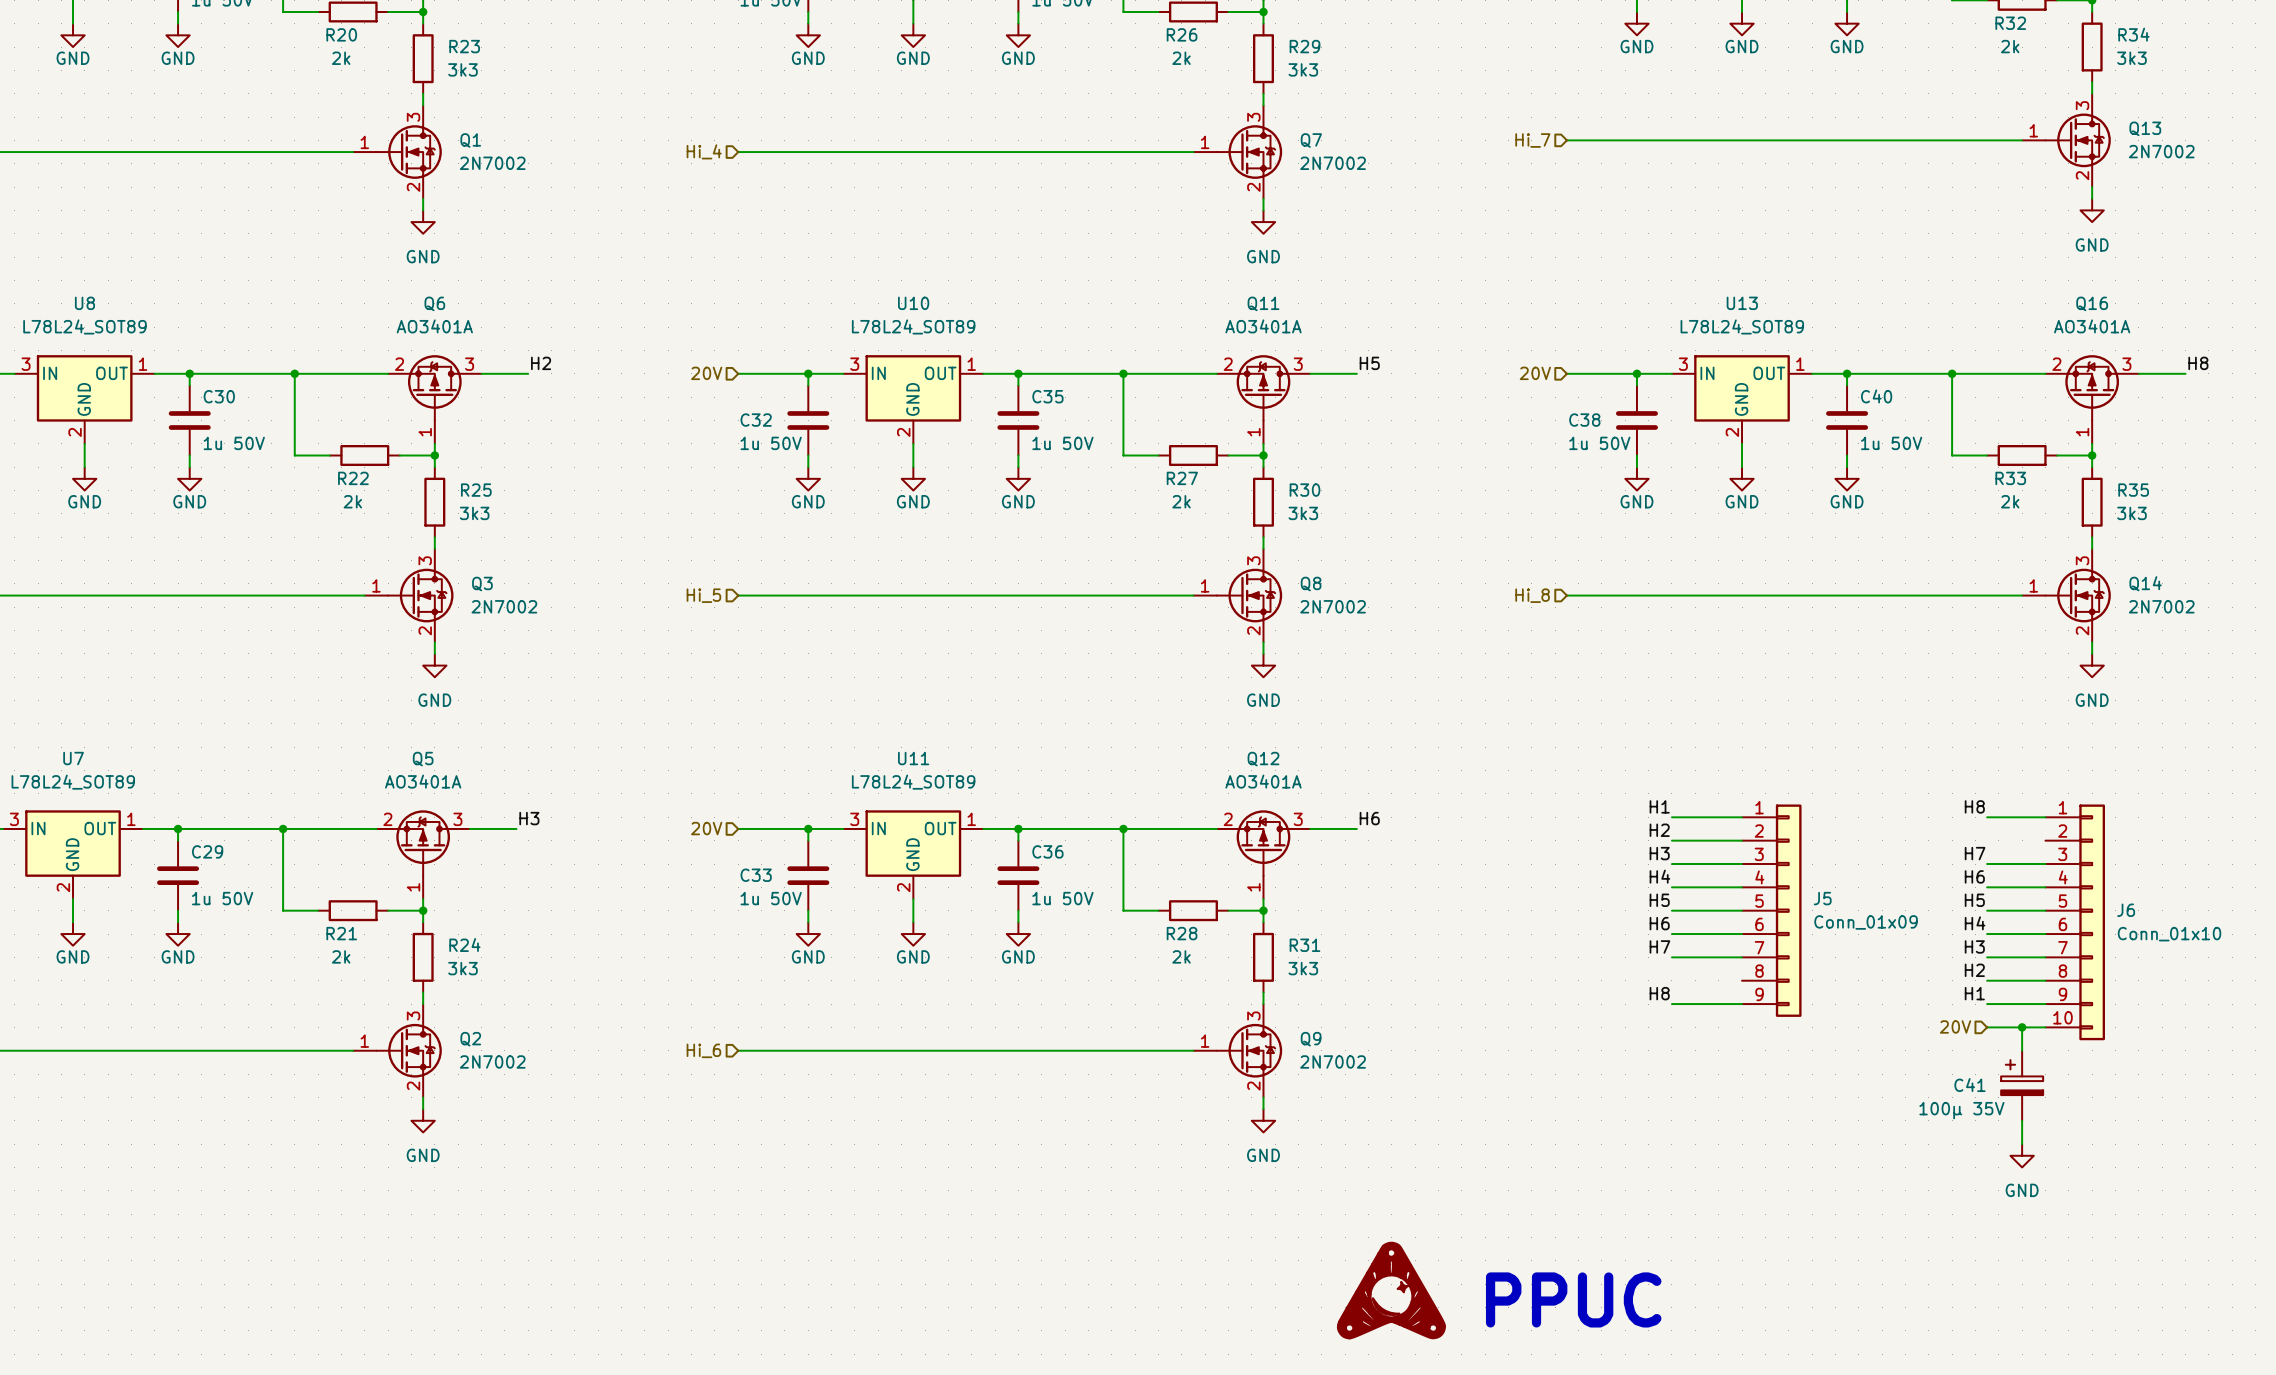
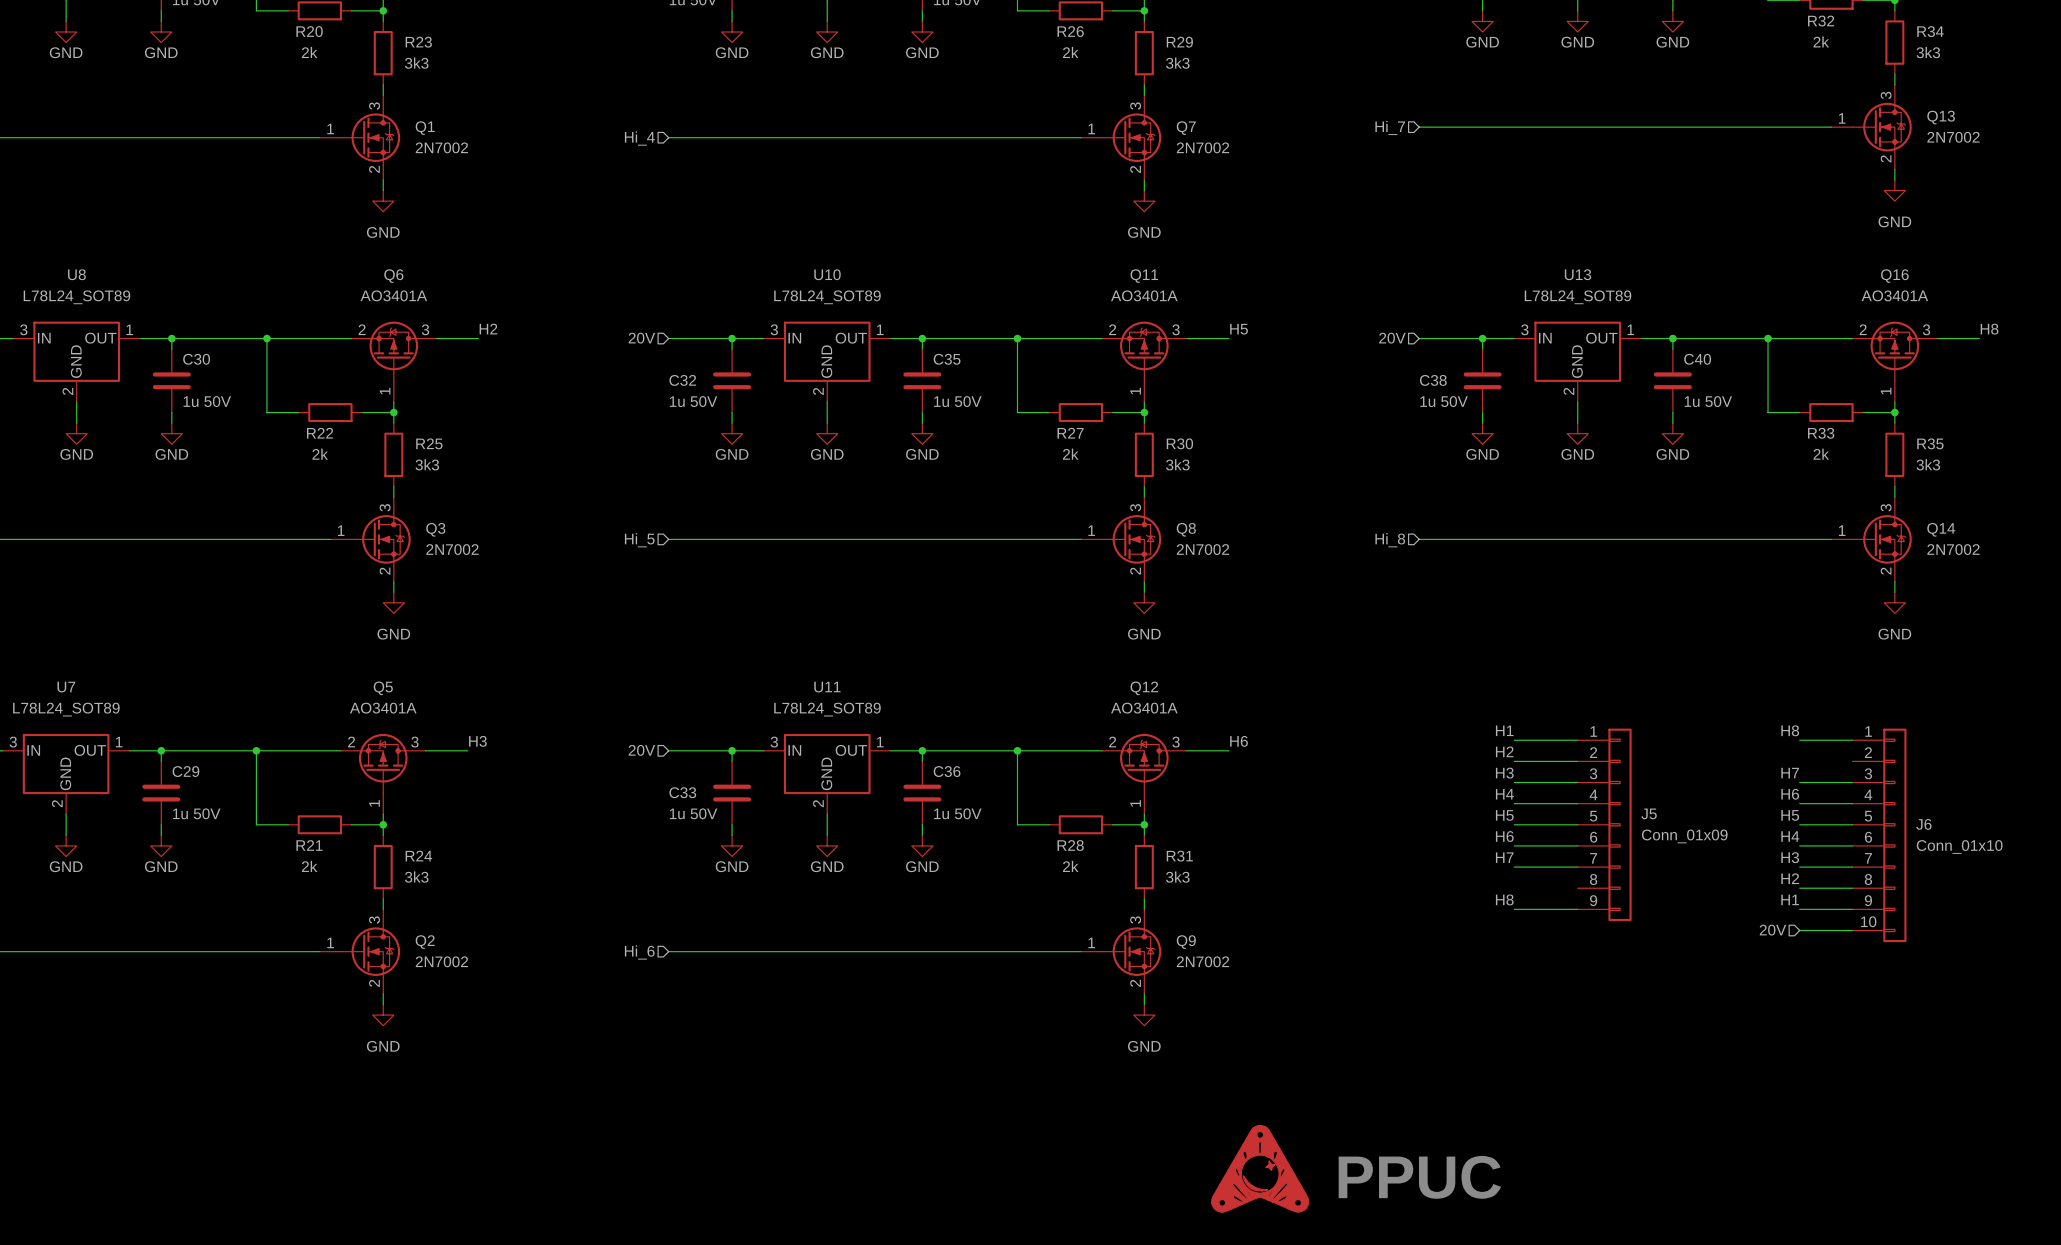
wire: (2022, 1027) (2022, 1050) -> none
junction: (2022, 1027) -> none
C41: 100µ 35V (2022, 1085) -> none
wire: (2022, 1120) (2022, 1144) -> none
power symbol: GND (2022, 1155) -> none

